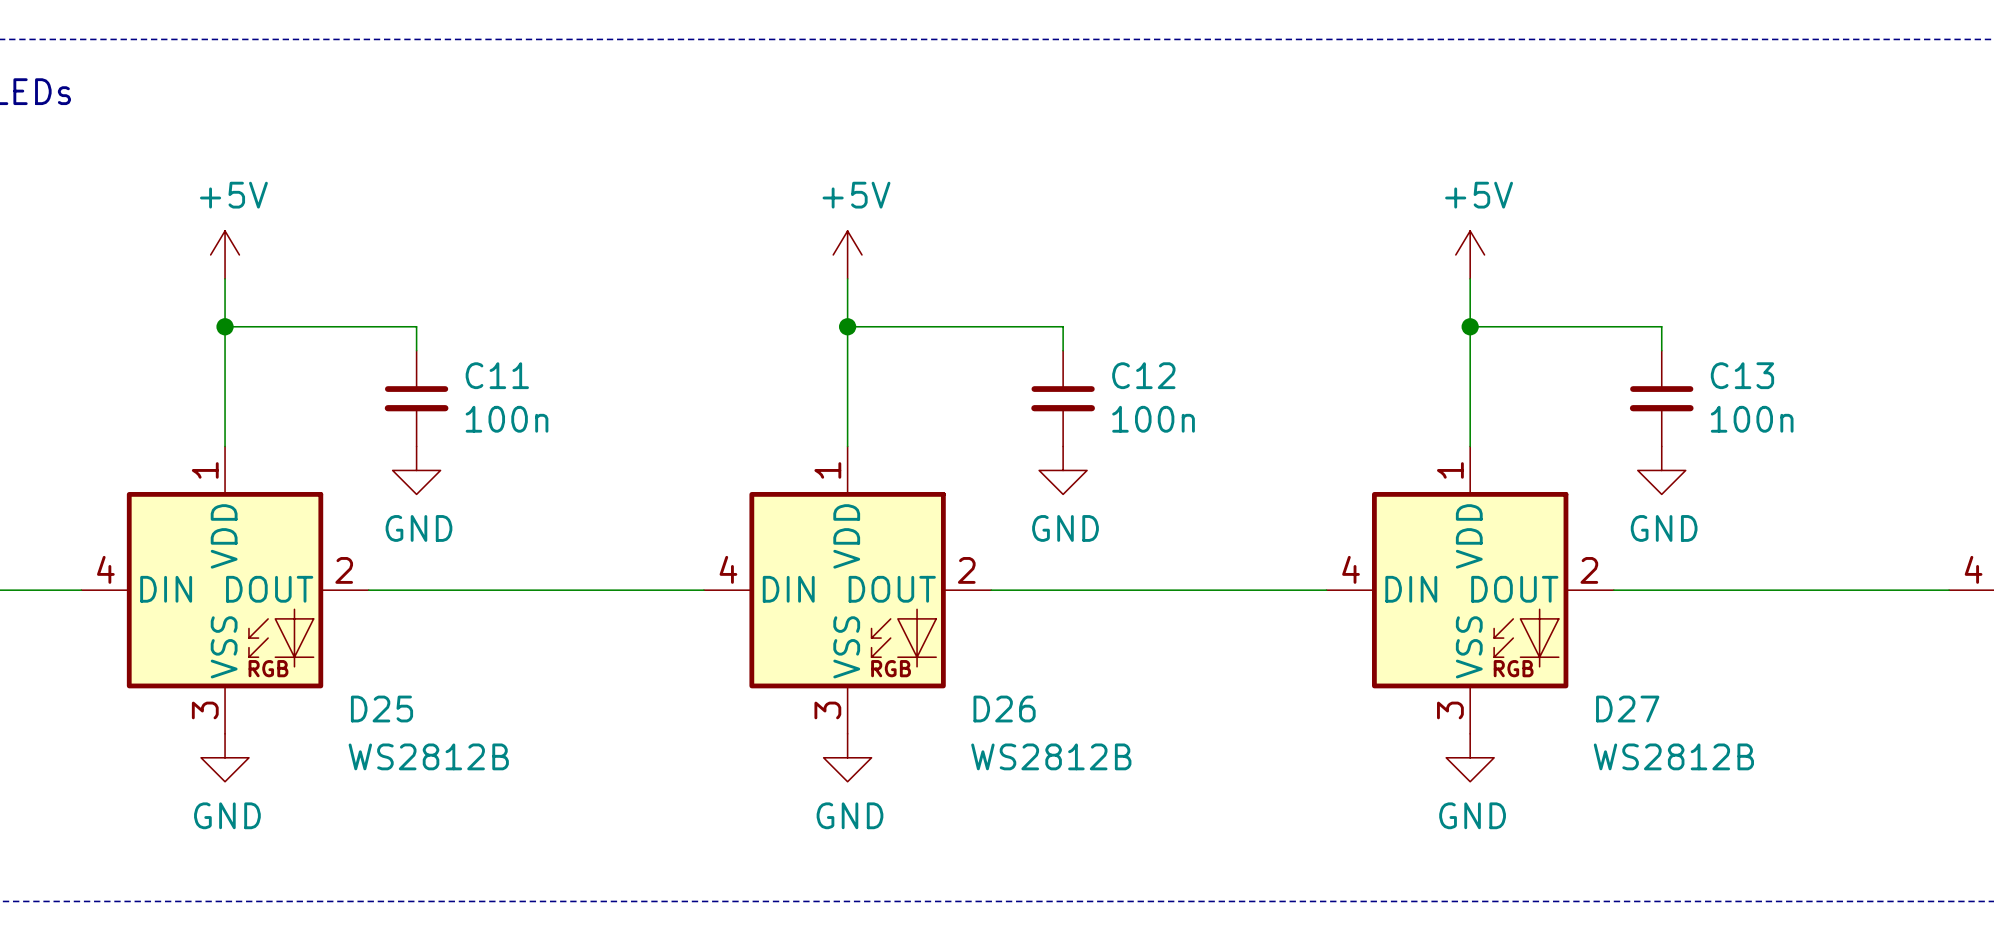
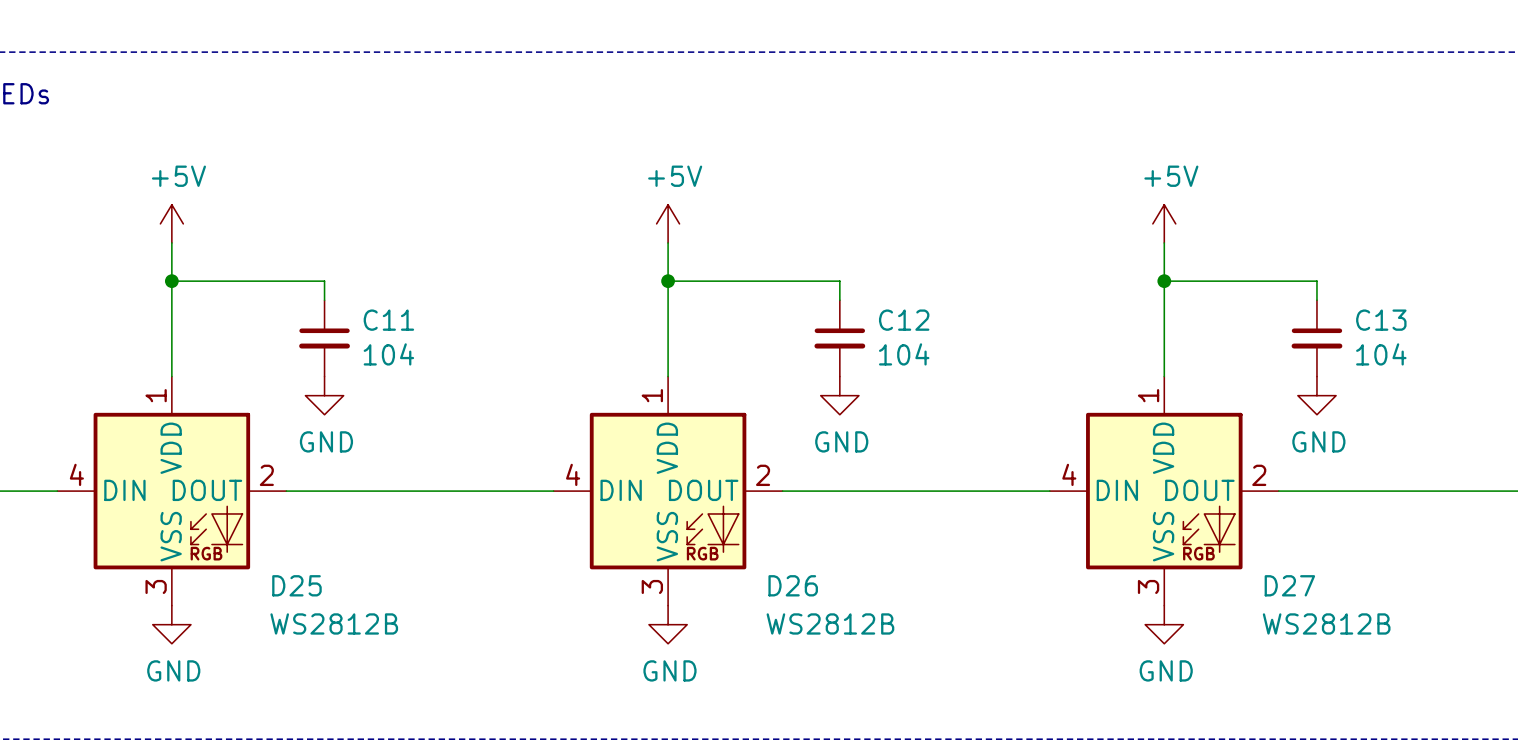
C11 value: 100n (507, 419) -> 104 (388, 354)
C12 value: 100n (1153, 419) -> 104 (904, 354)
C13 value: 100n (1752, 419) -> 104 (1381, 354)

